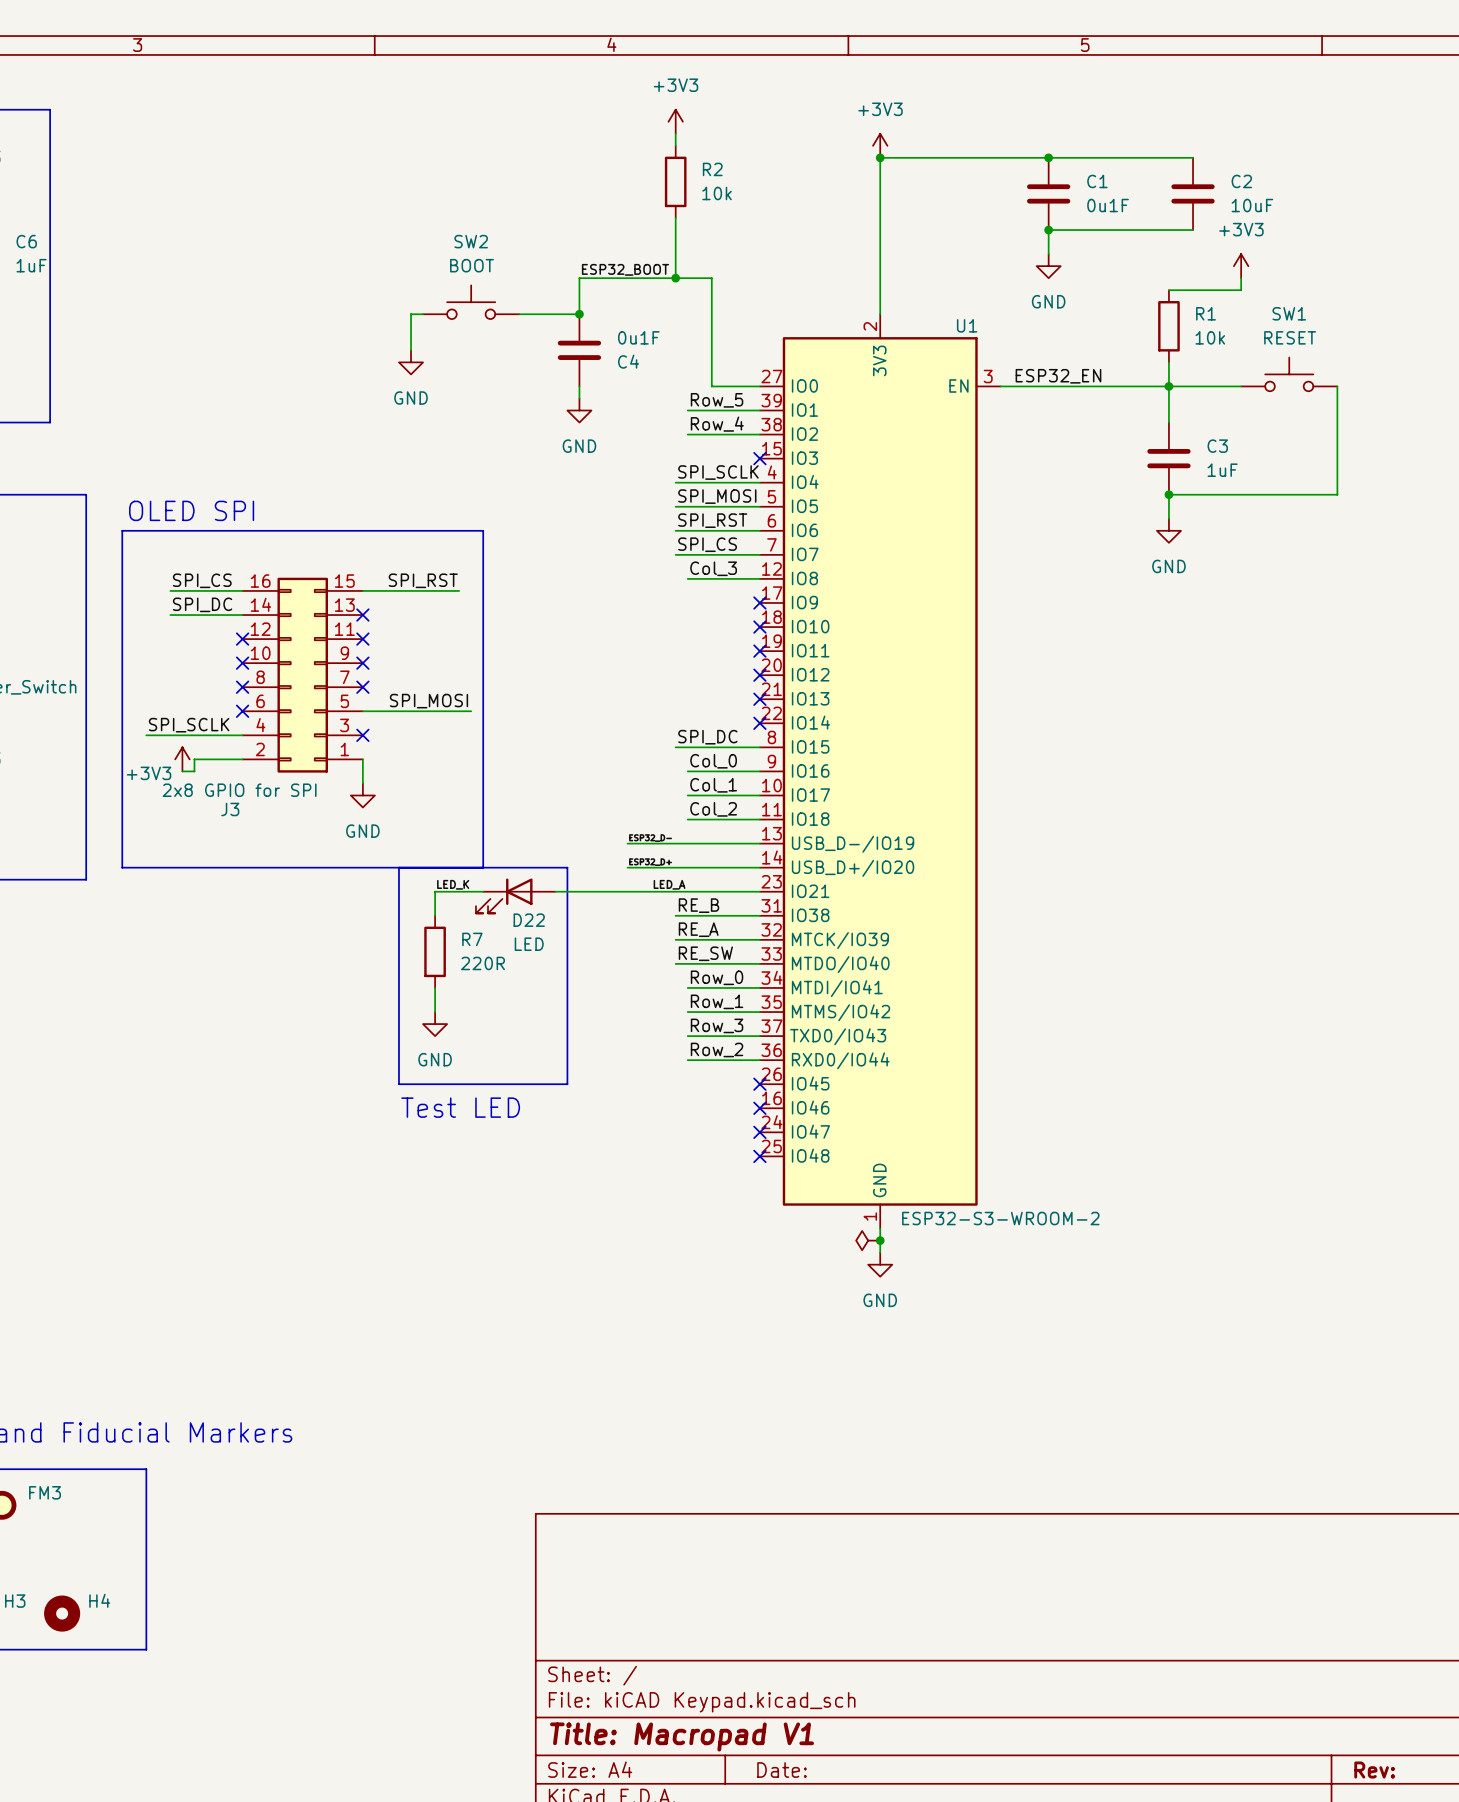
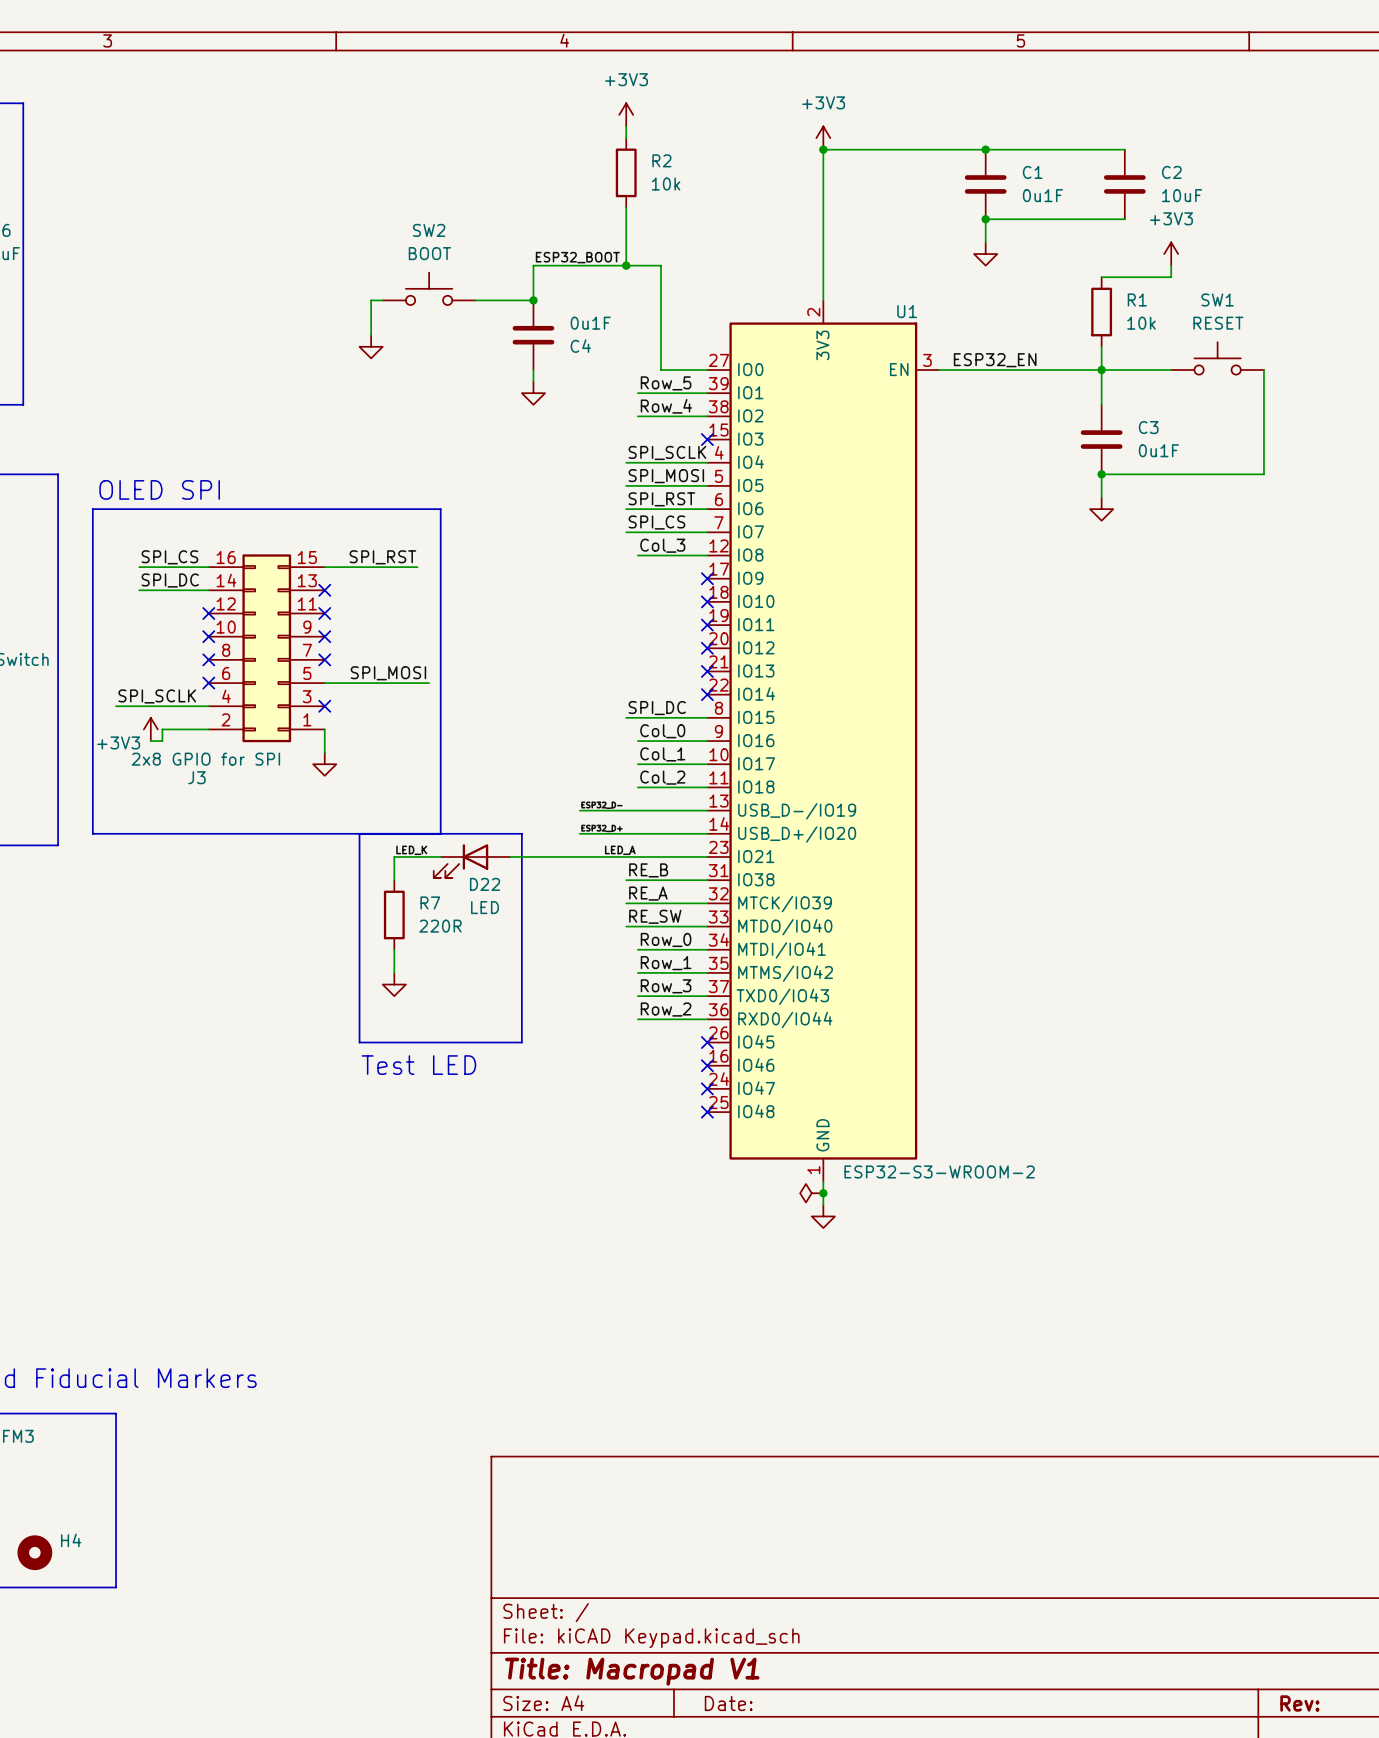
power symbol text: GND (1048, 301) -> none
power symbol text: GND (411, 398) -> none
power symbol text: GND (579, 446) -> none
C3 value: 1uF (1222, 470) -> 0u1F (1158, 450)
power symbol text: GND (1168, 566) -> none
power symbol text: GND (362, 831) -> none
power symbol text: GND (435, 1059) -> none
power symbol text: GND (880, 1300) -> none

